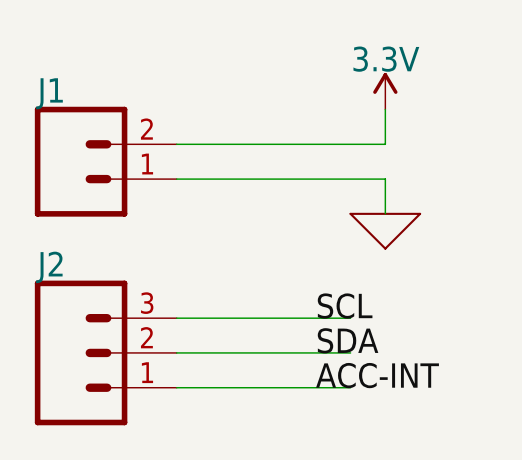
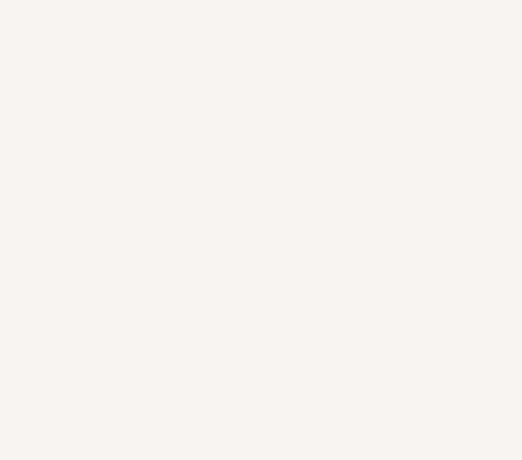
power symbol: 3.3V (385, 91) -> none
wire: (385, 109) (385, 144) (176, 144) -> none
J1: (105, 161) -> none
wire: (176, 179) (385, 179) (385, 213) -> none
power symbol: (385, 231) -> none
label: SCL (345, 306) -> none
wire: (176, 318) (350, 318) -> none
label: SDA (348, 340) -> none
J2: (105, 352) -> none
wire: (176, 352) (350, 352) -> none
label: ACC-INT (377, 375) -> none
wire: (176, 387) (350, 387) -> none

